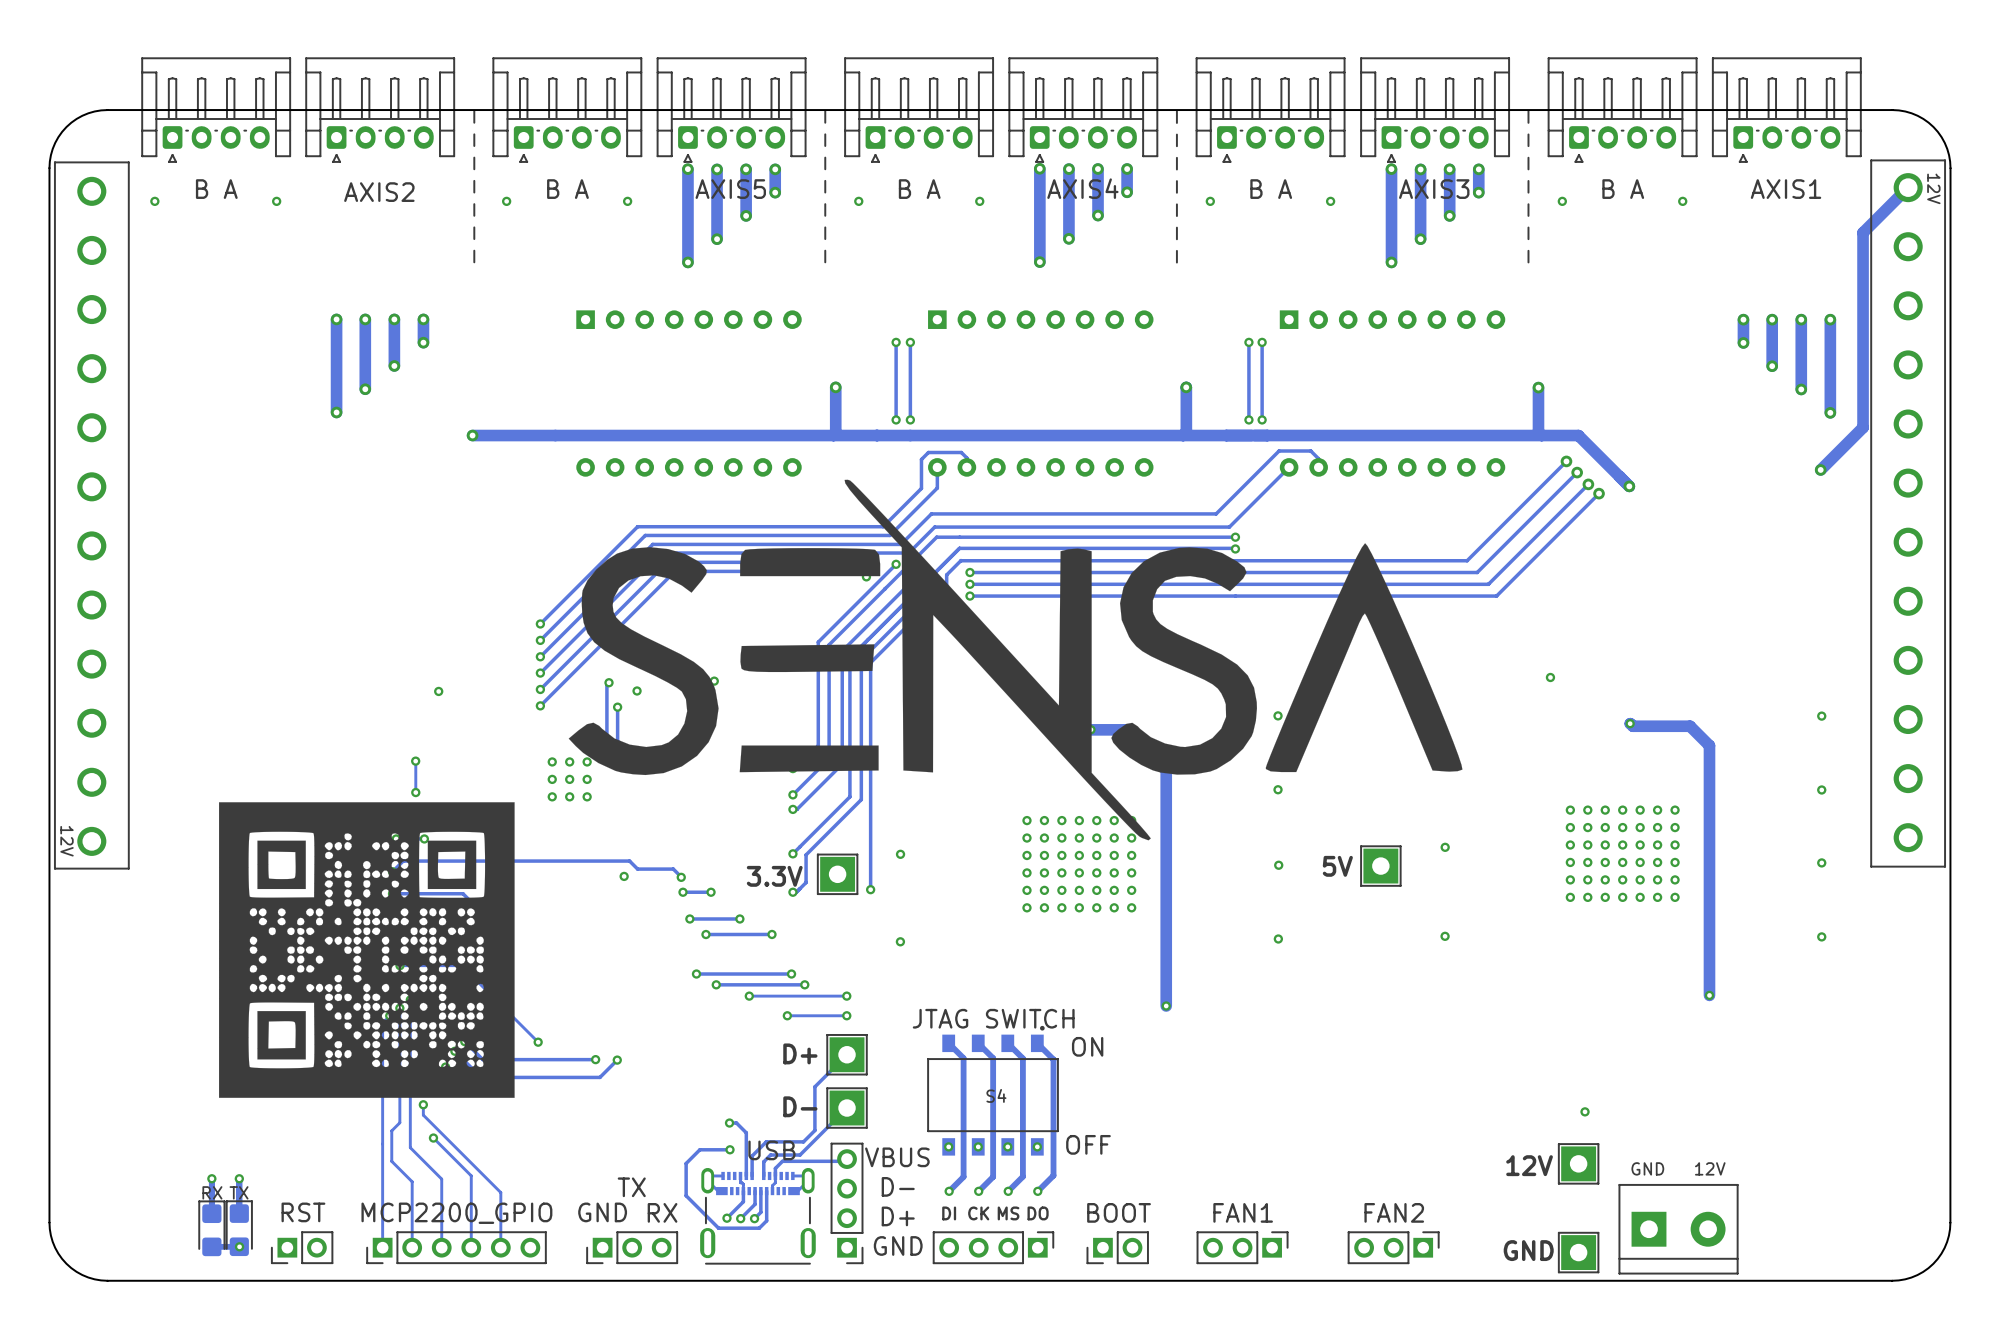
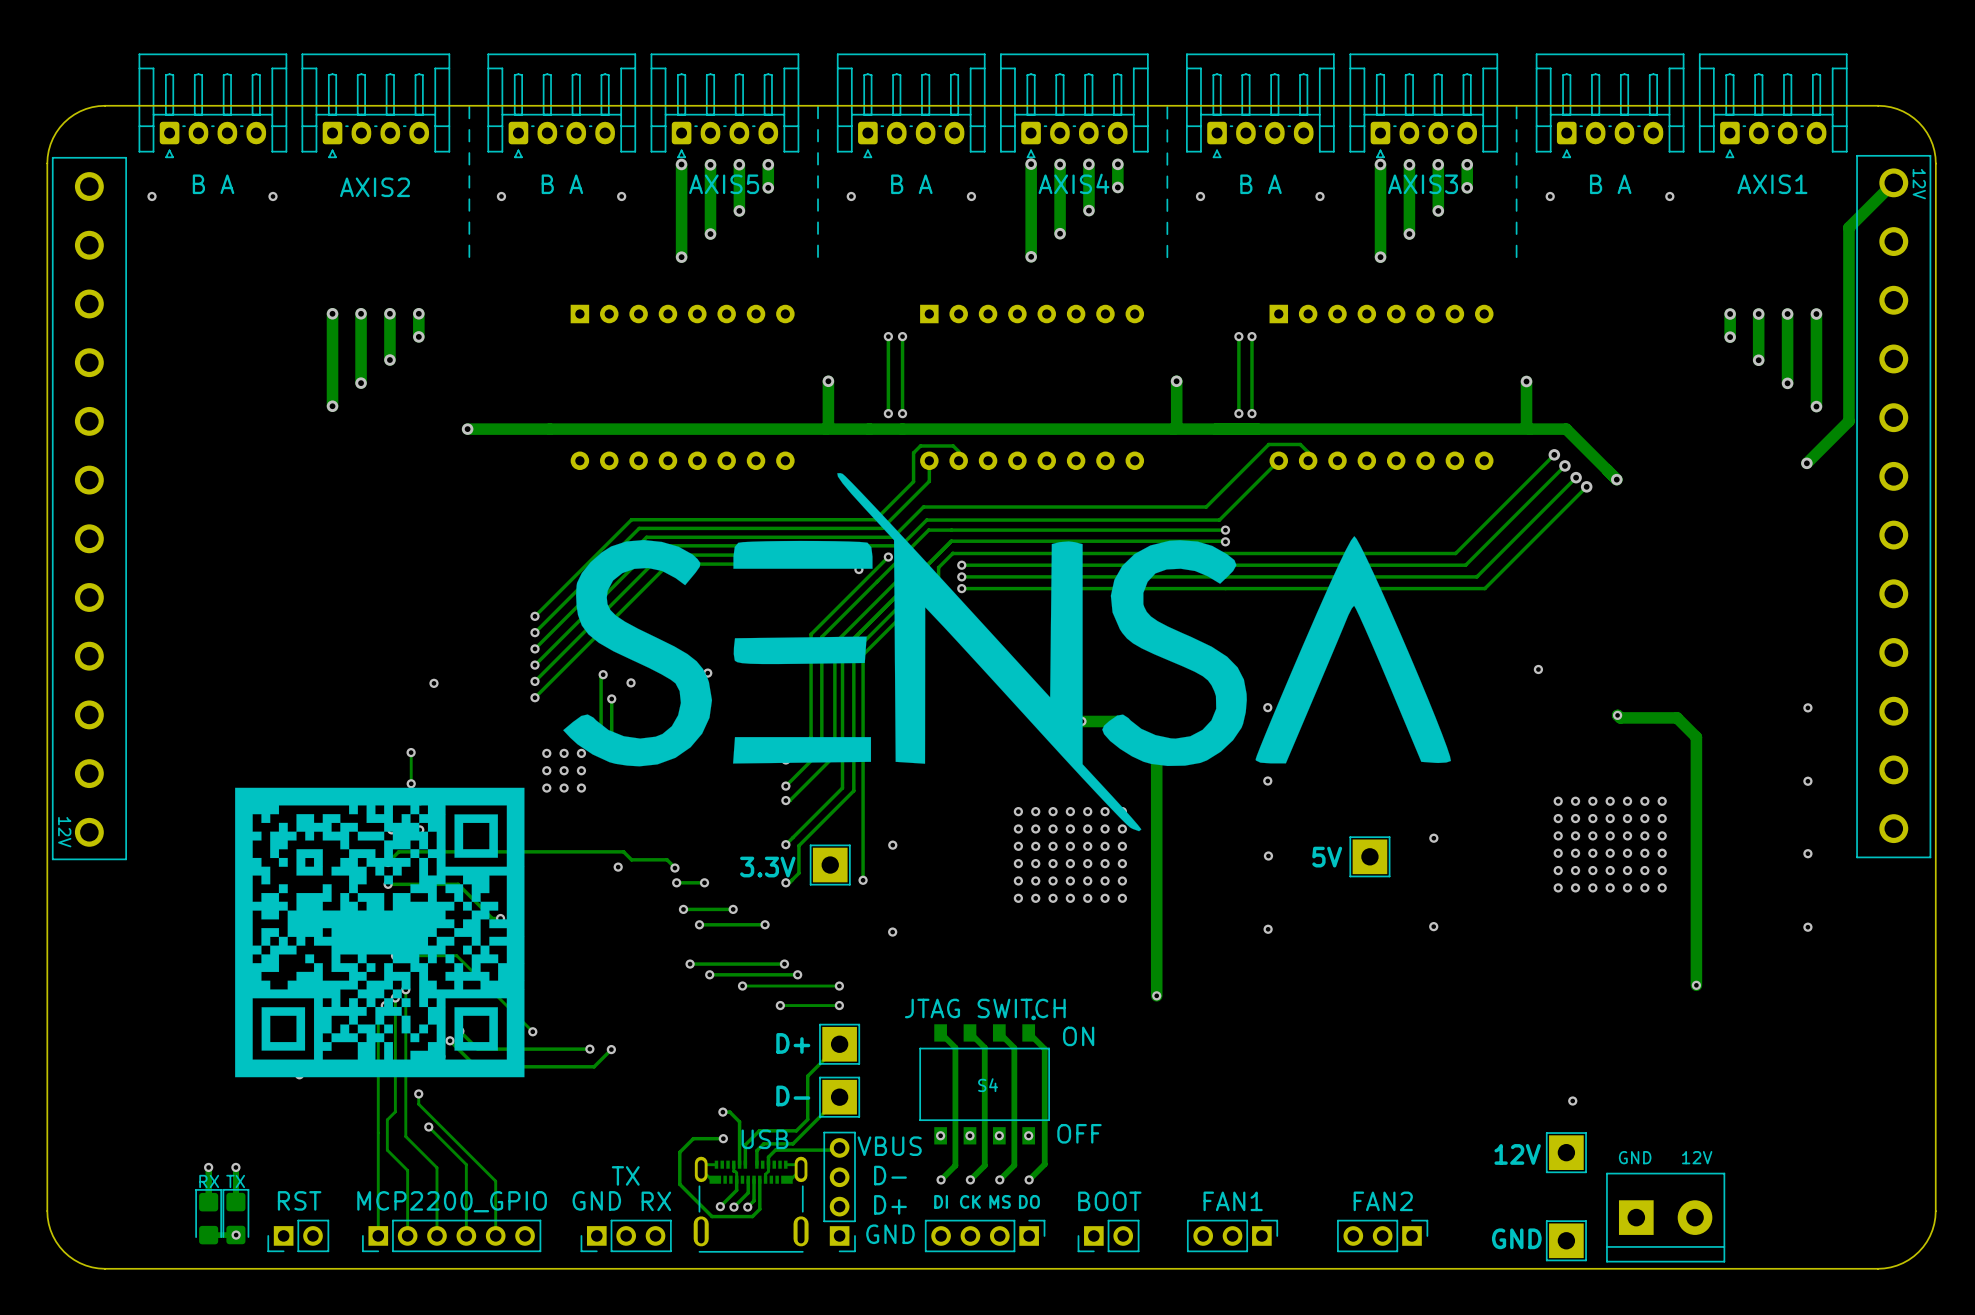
drawing: none -> [235, 787, 525, 1078]
drawing: [219, 802, 515, 1098] -> none

